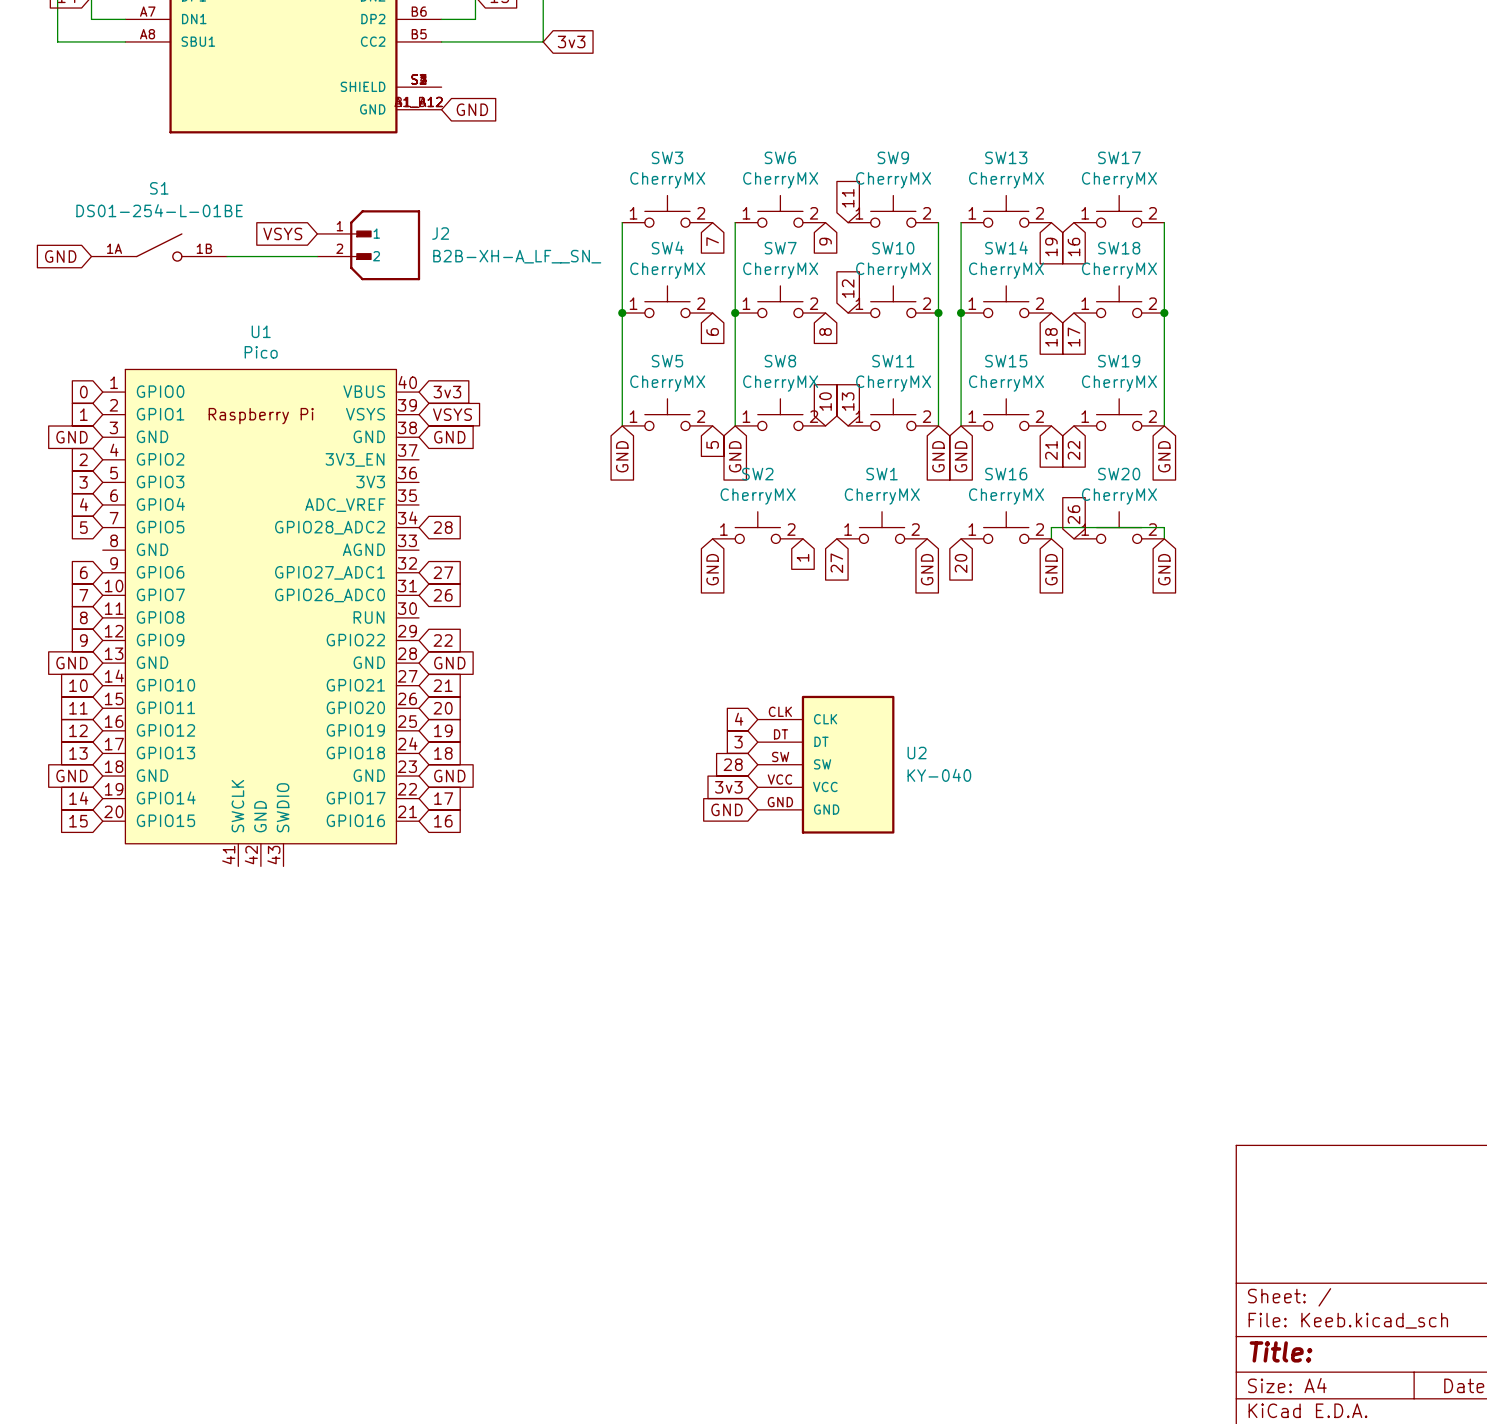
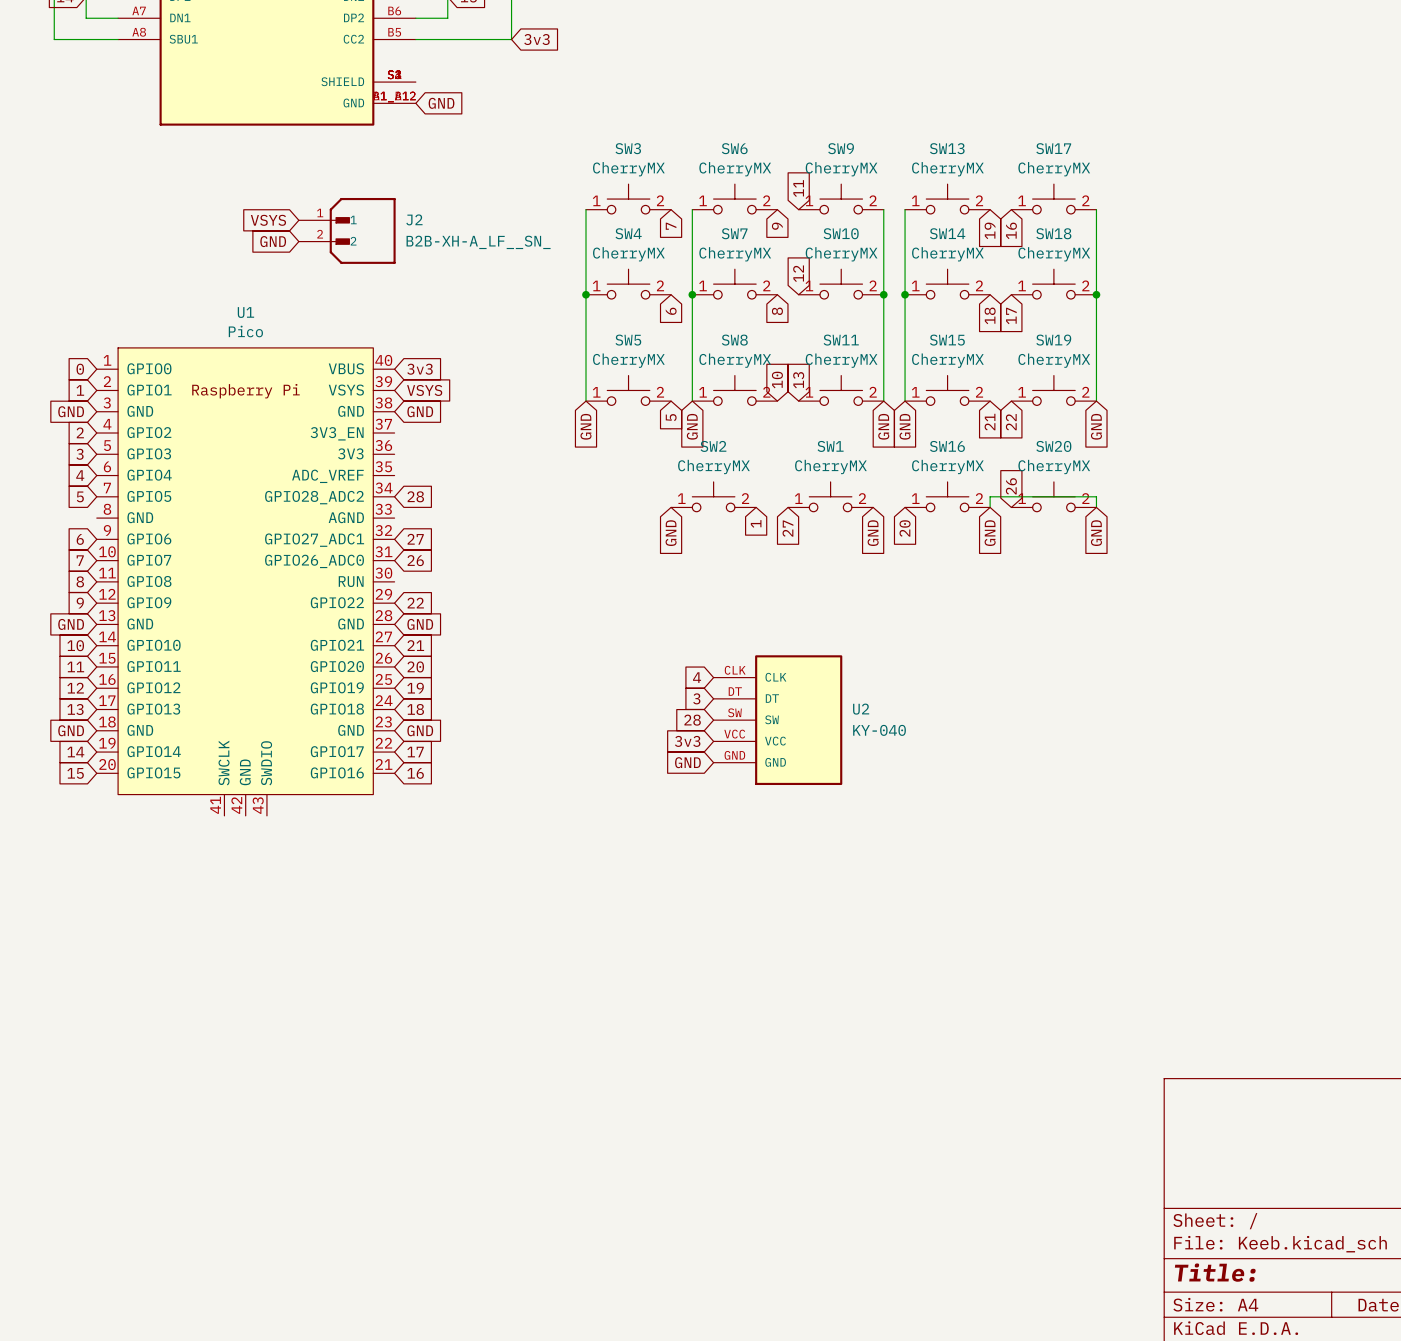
S1: DS01-254-L-01BE (159, 247) -> none
global label: GND (60, 256) -> none
wire: (227, 256) (317, 256) -> none
global label: none -> GND (273, 241)

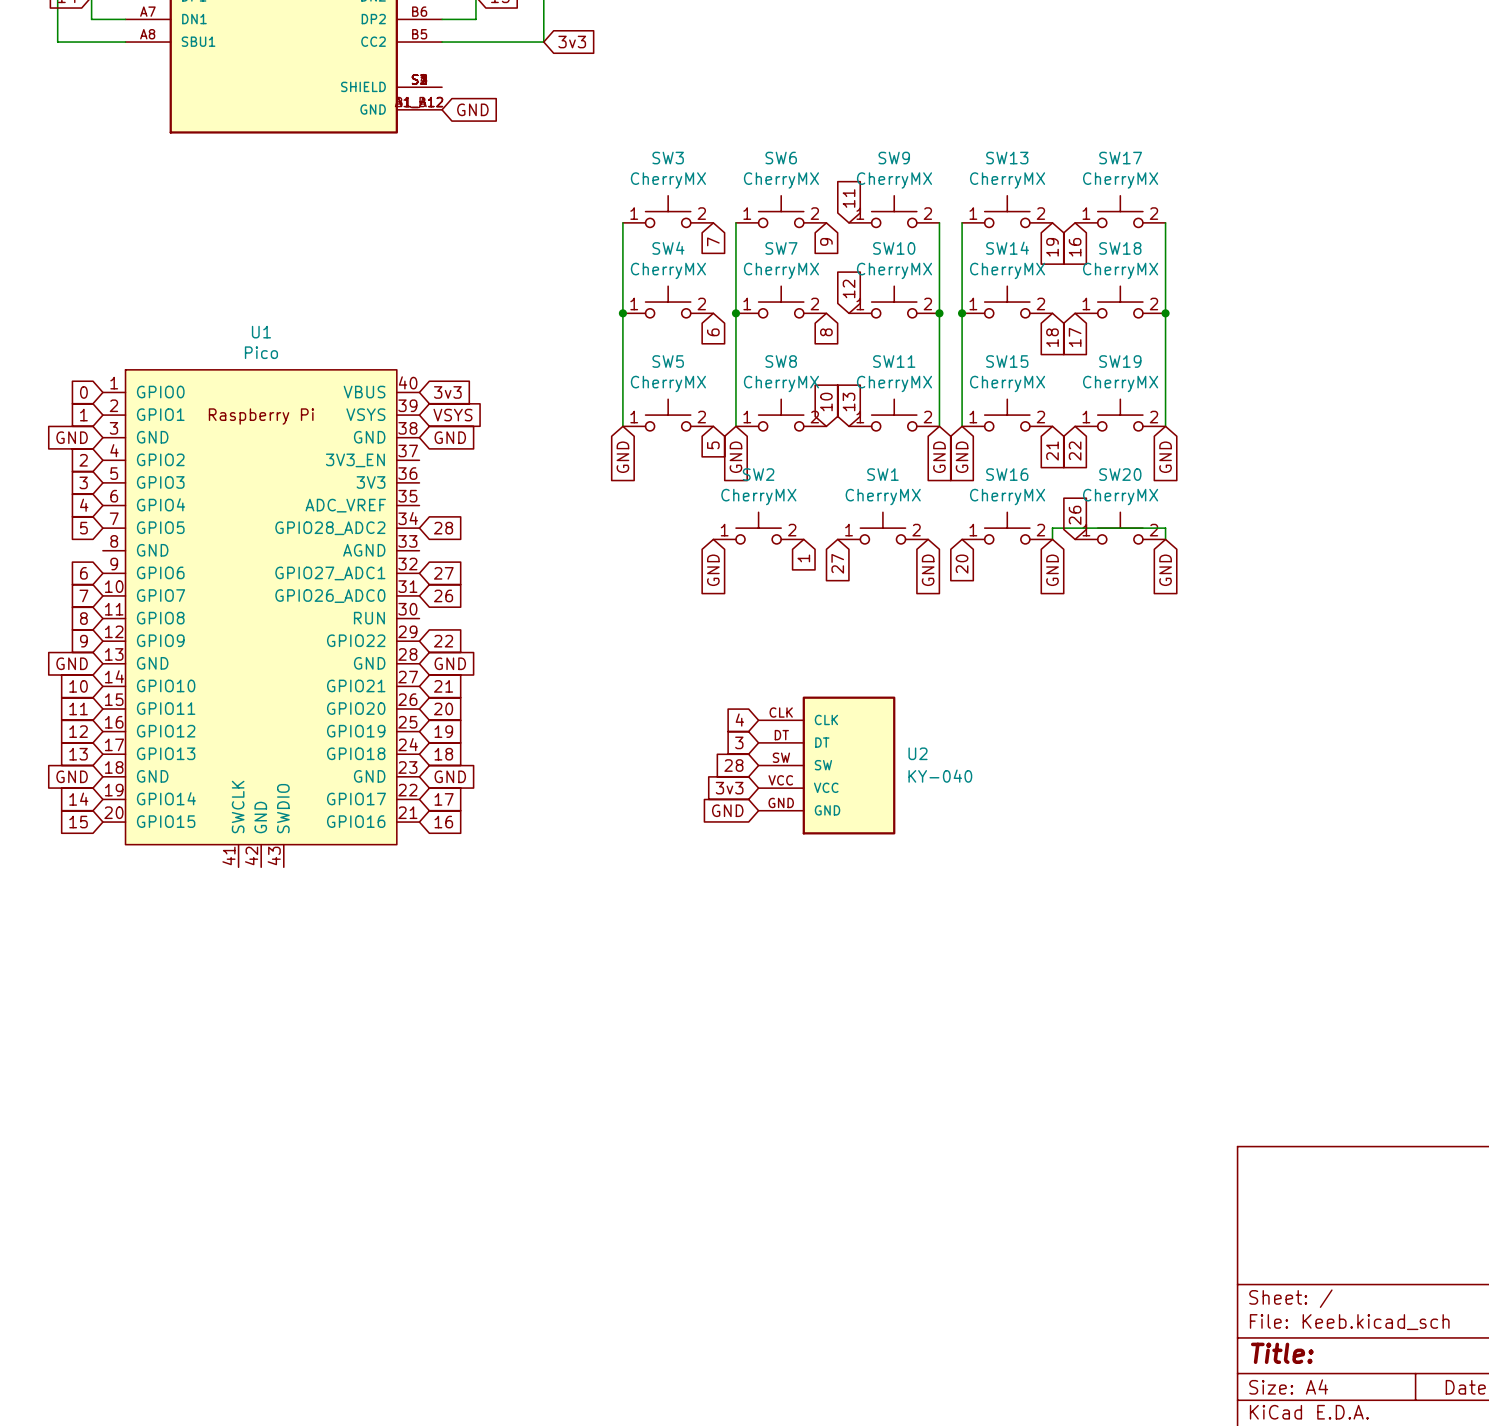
global label: VSYS (268, 220) -> none
J2: B2B-XH-A_LF__SN_ (347, 230) -> none
global label: GND (273, 241) -> none

